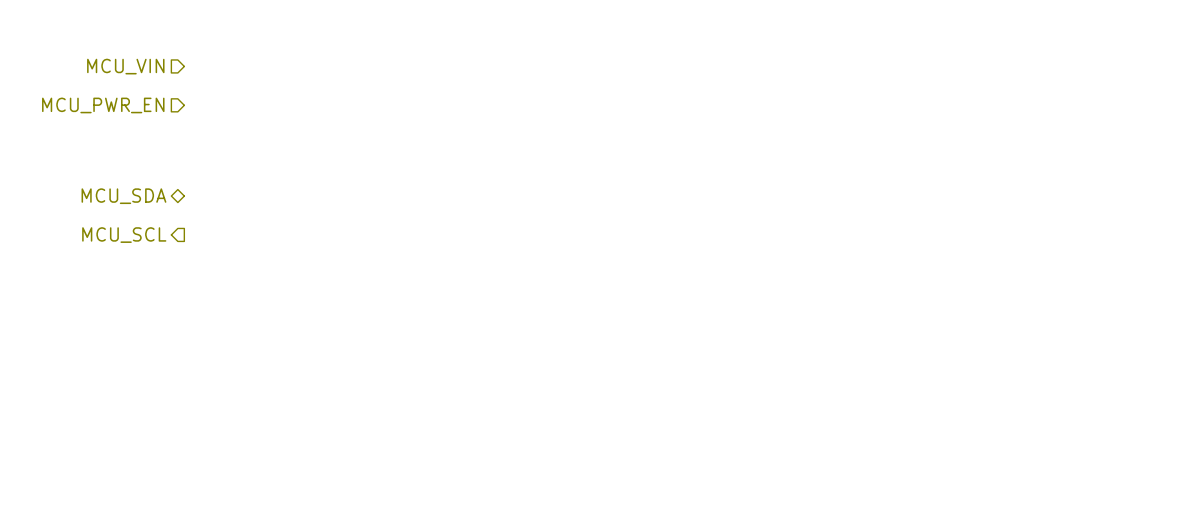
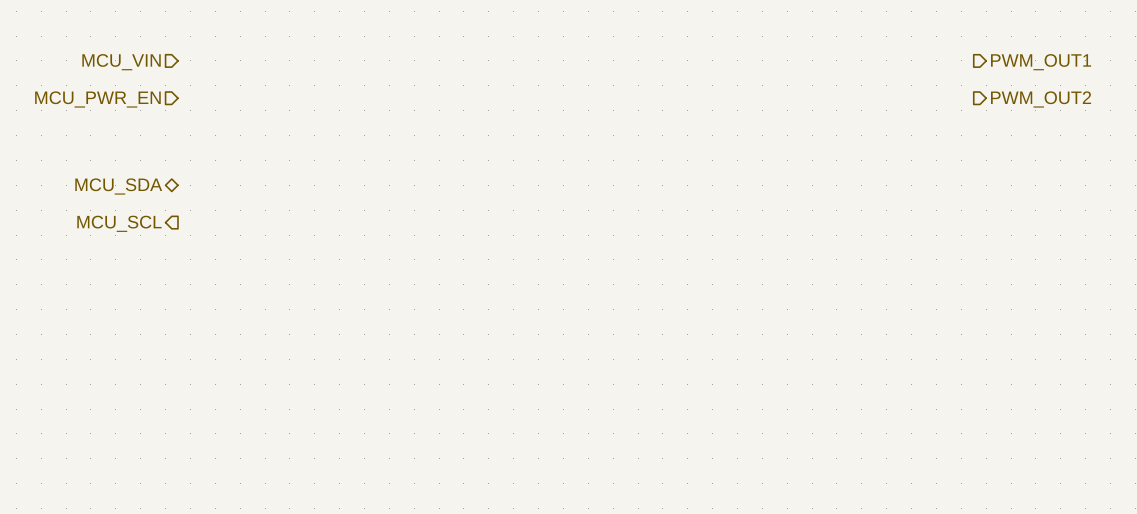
hierarchical label: none -> PWM_OUT1 (1041, 62)
hierarchical label: none -> PWM_OUT2 (1041, 99)

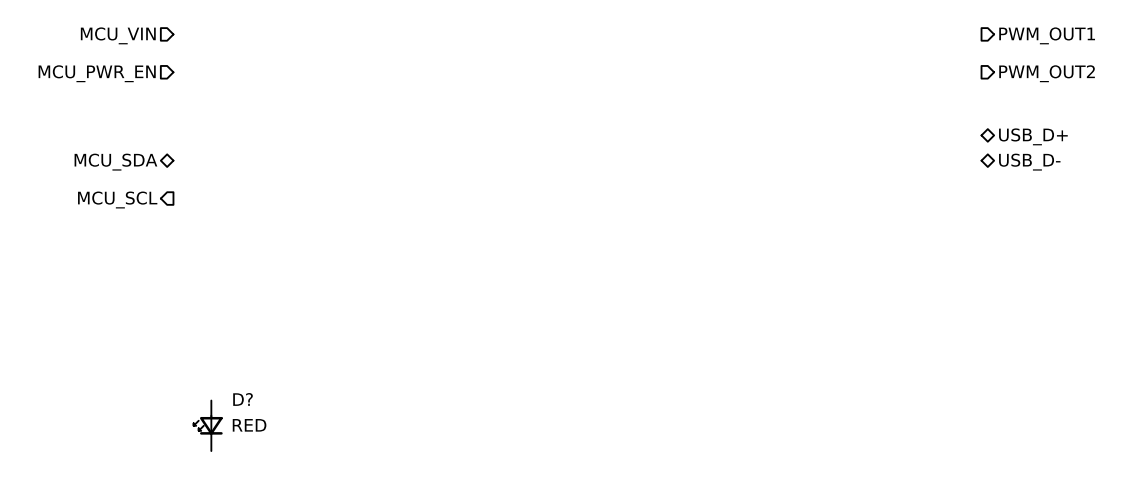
hierarchical label: none -> USB_D+ (1033, 136)
hierarchical label: none -> USB_D- (1029, 162)
D?: none -> RED (208, 425)

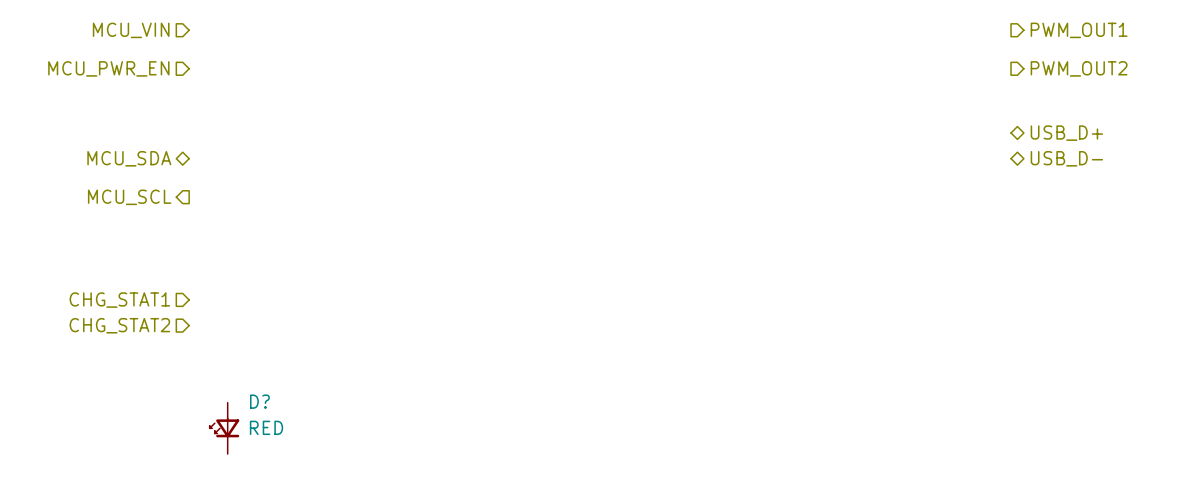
hierarchical label: none -> CHG_STAT1 (119, 300)
hierarchical label: none -> CHG_STAT2 (119, 325)

